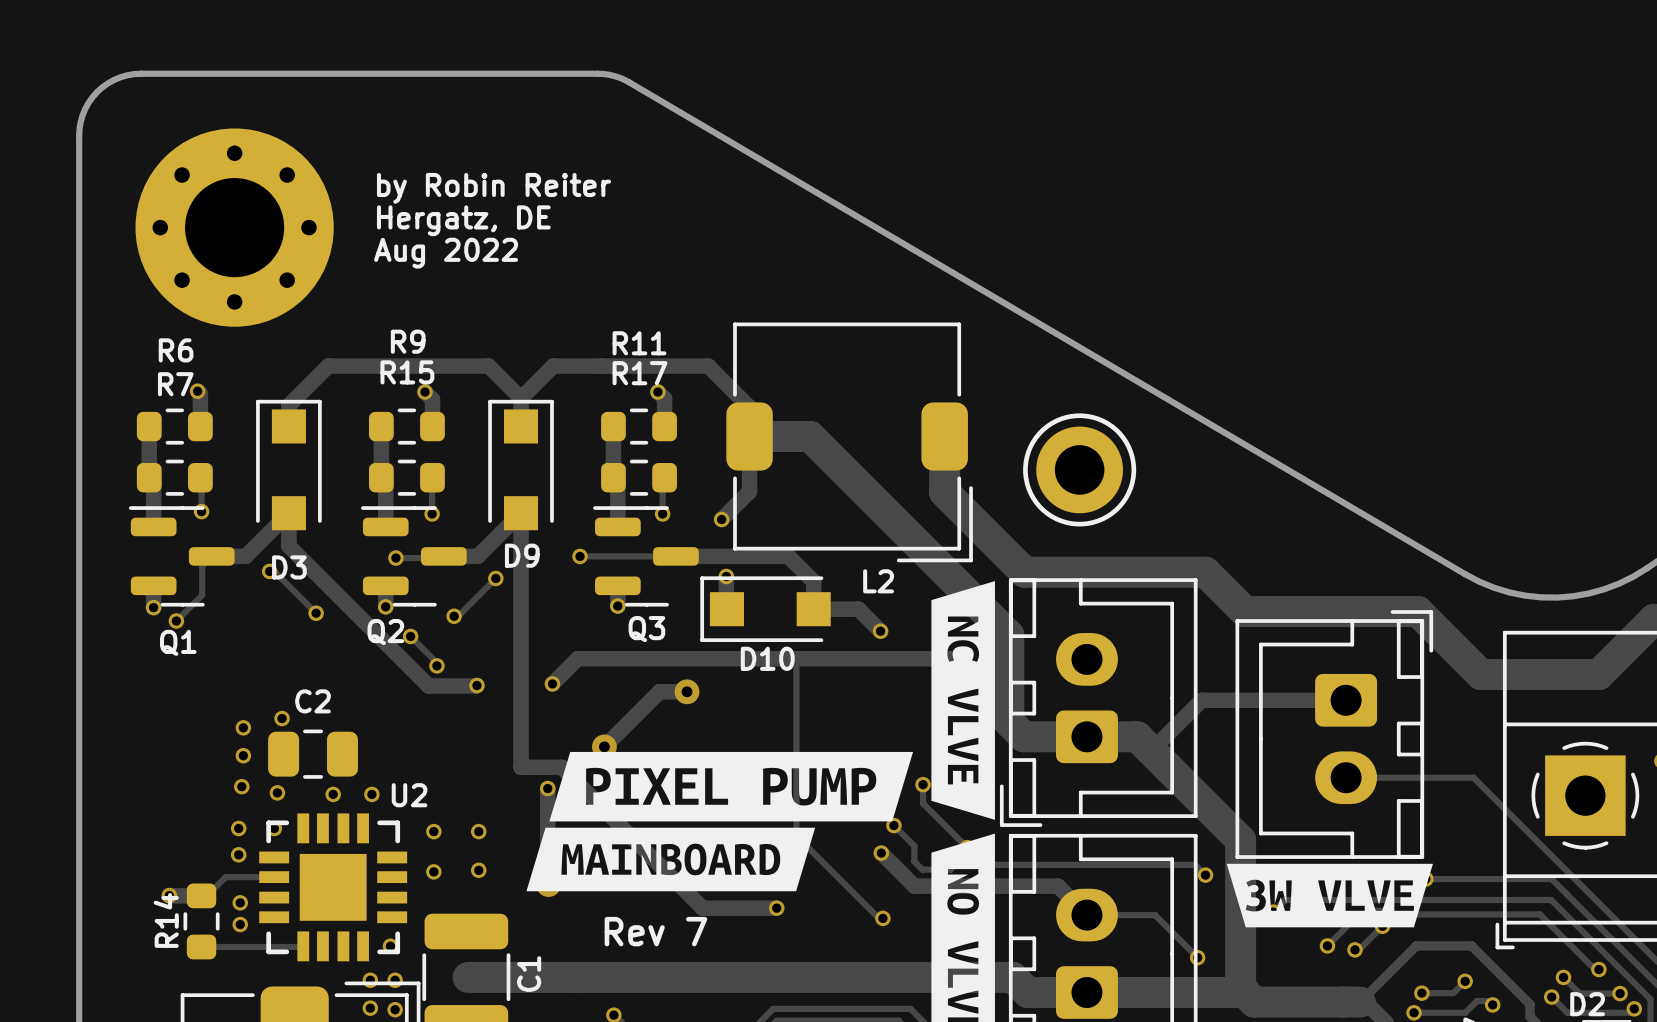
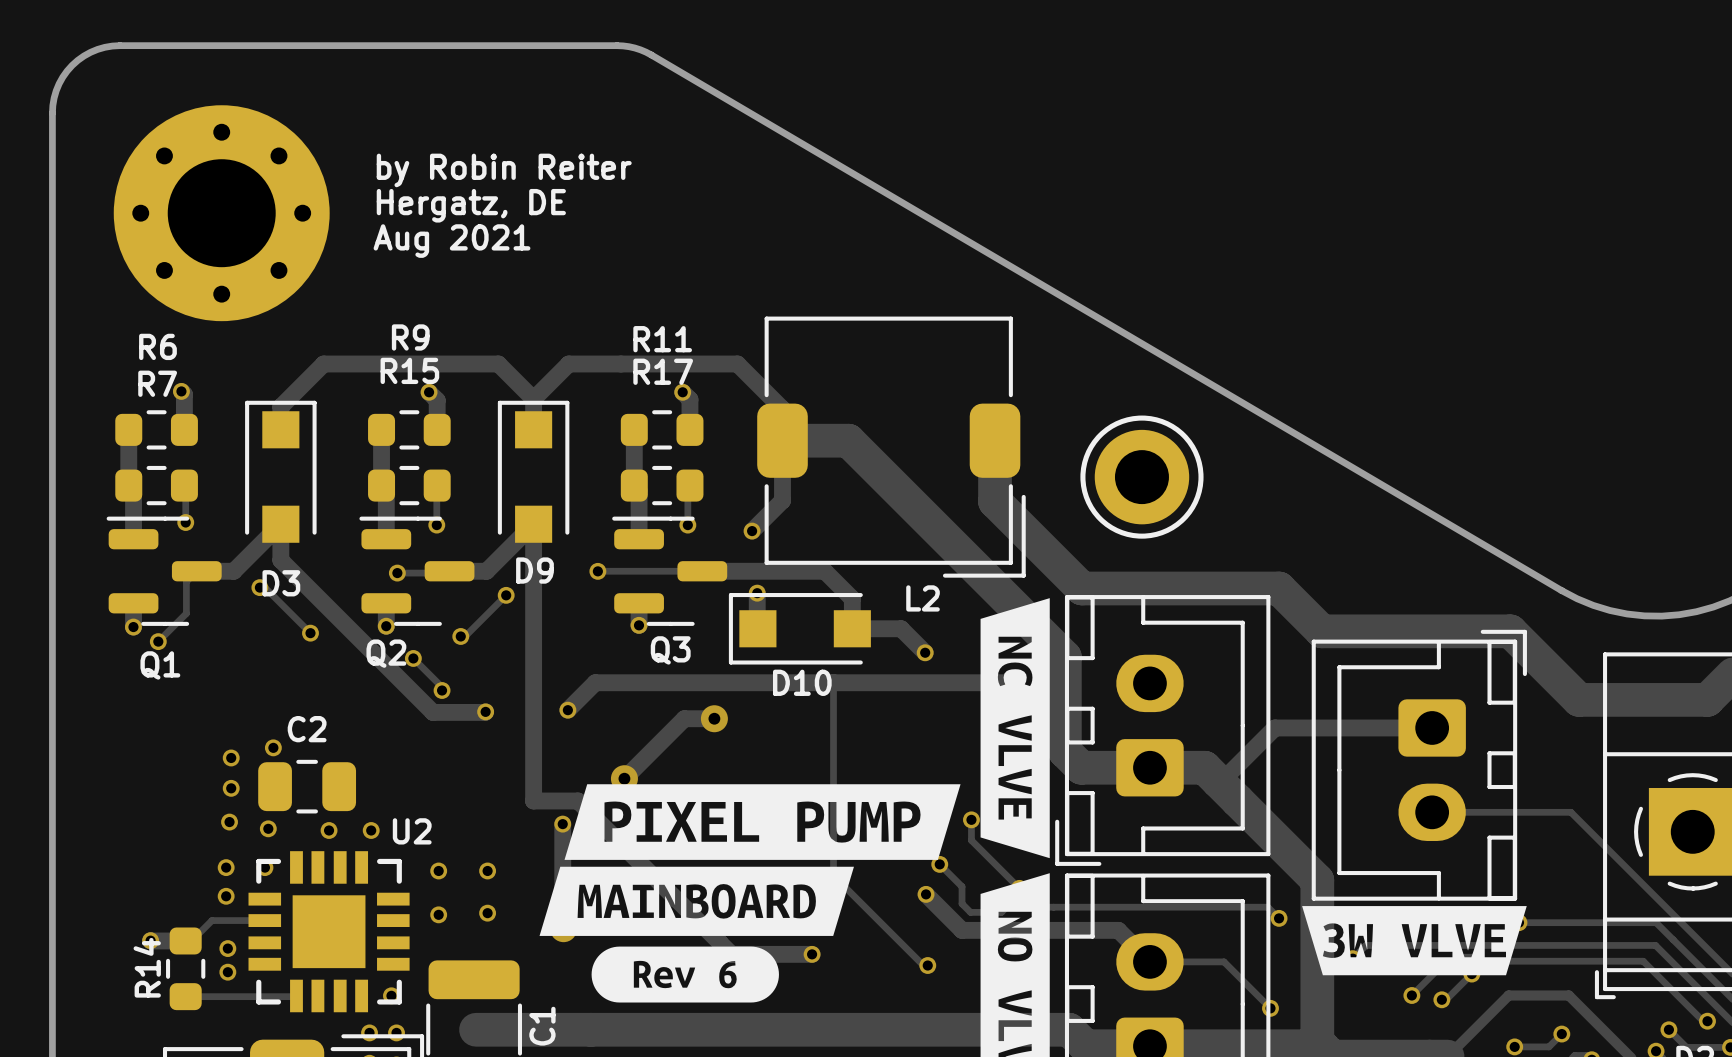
text: Aug 2022 (446, 253) -> Aug 2021 (452, 241)
drawing: none -> [591, 946, 779, 1003]
text: Rev 7 (655, 931) -> none

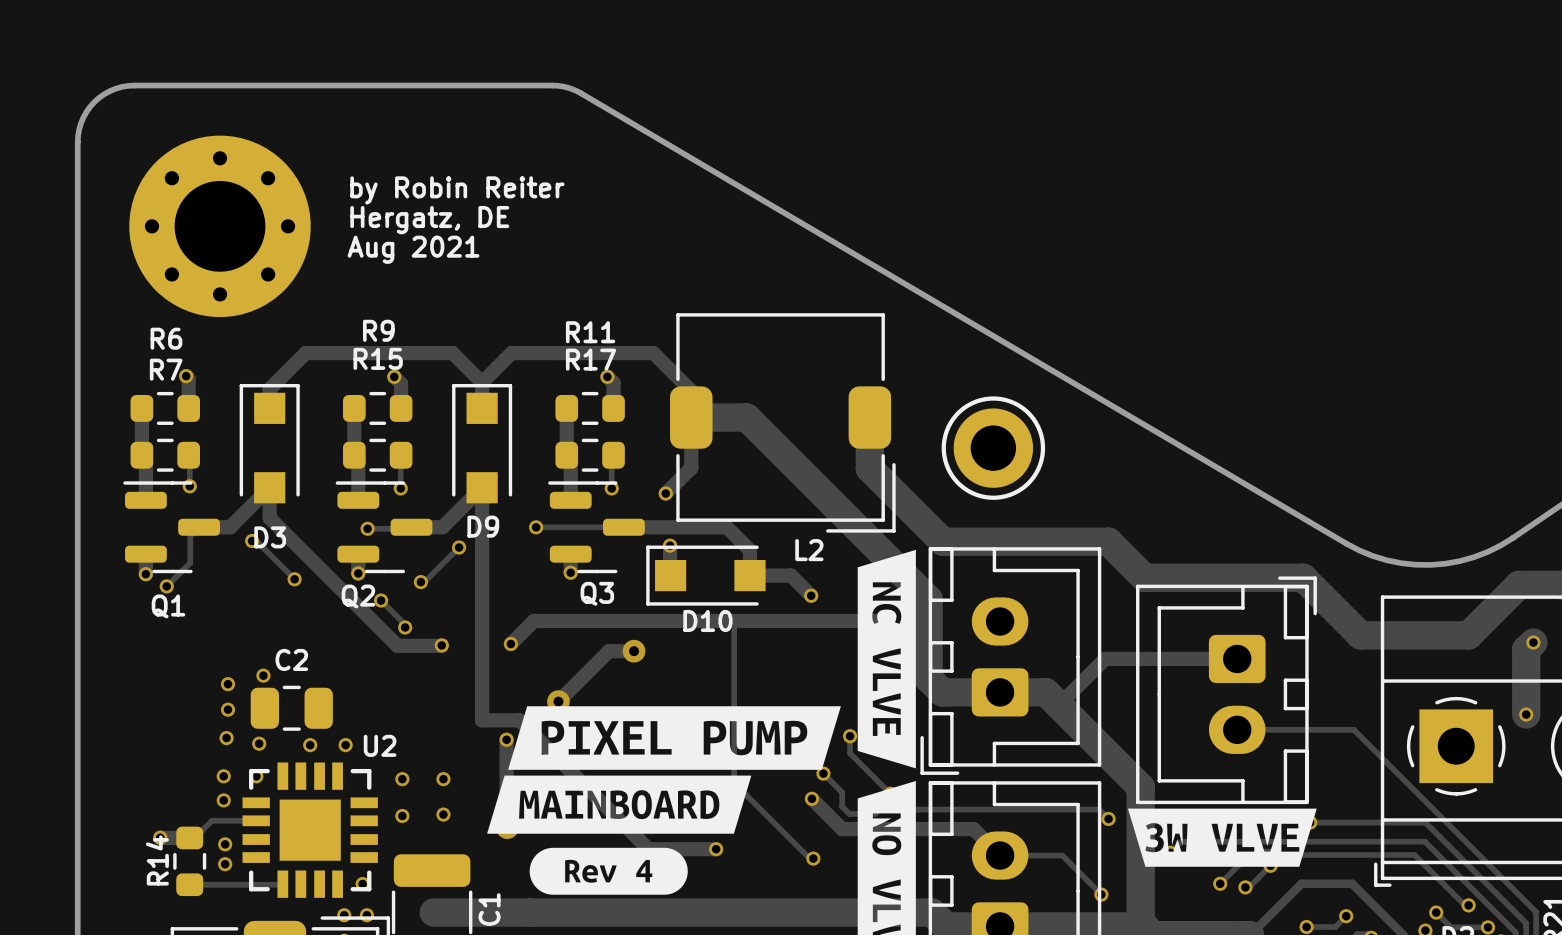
drawing shape: [591, 946, 779, 1003] -> [529, 847, 688, 895]

